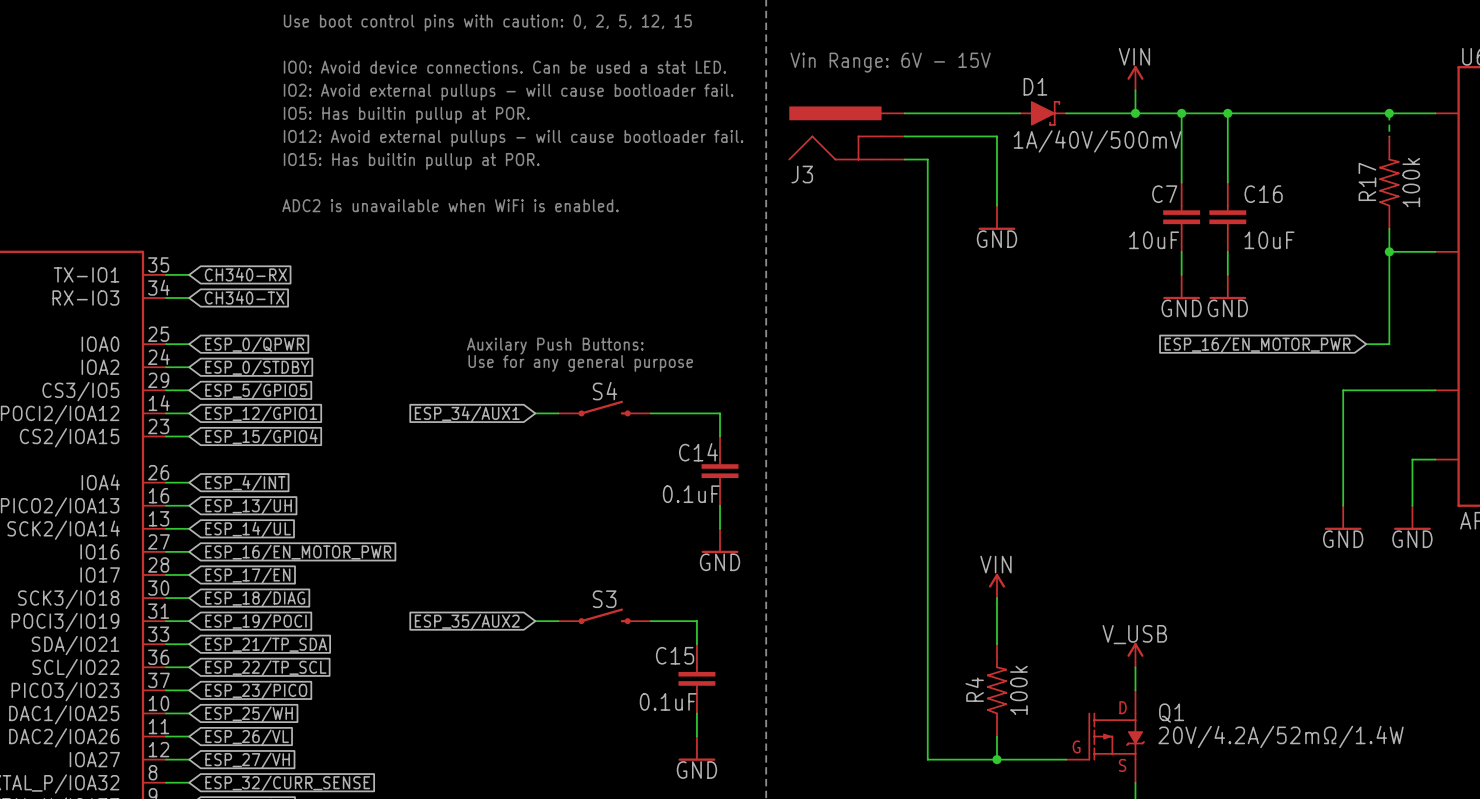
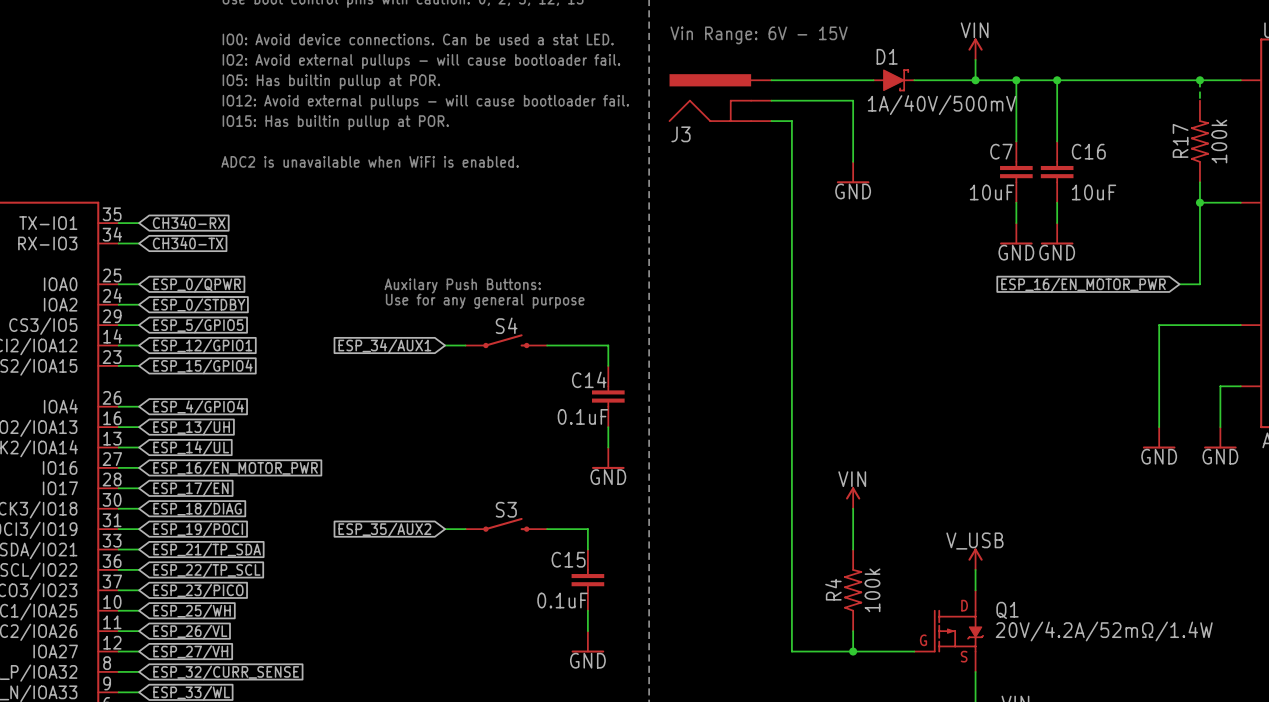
global label: ESP_4/~{INT} (245, 482) -> ESP_4/GPIO4 (198, 407)

